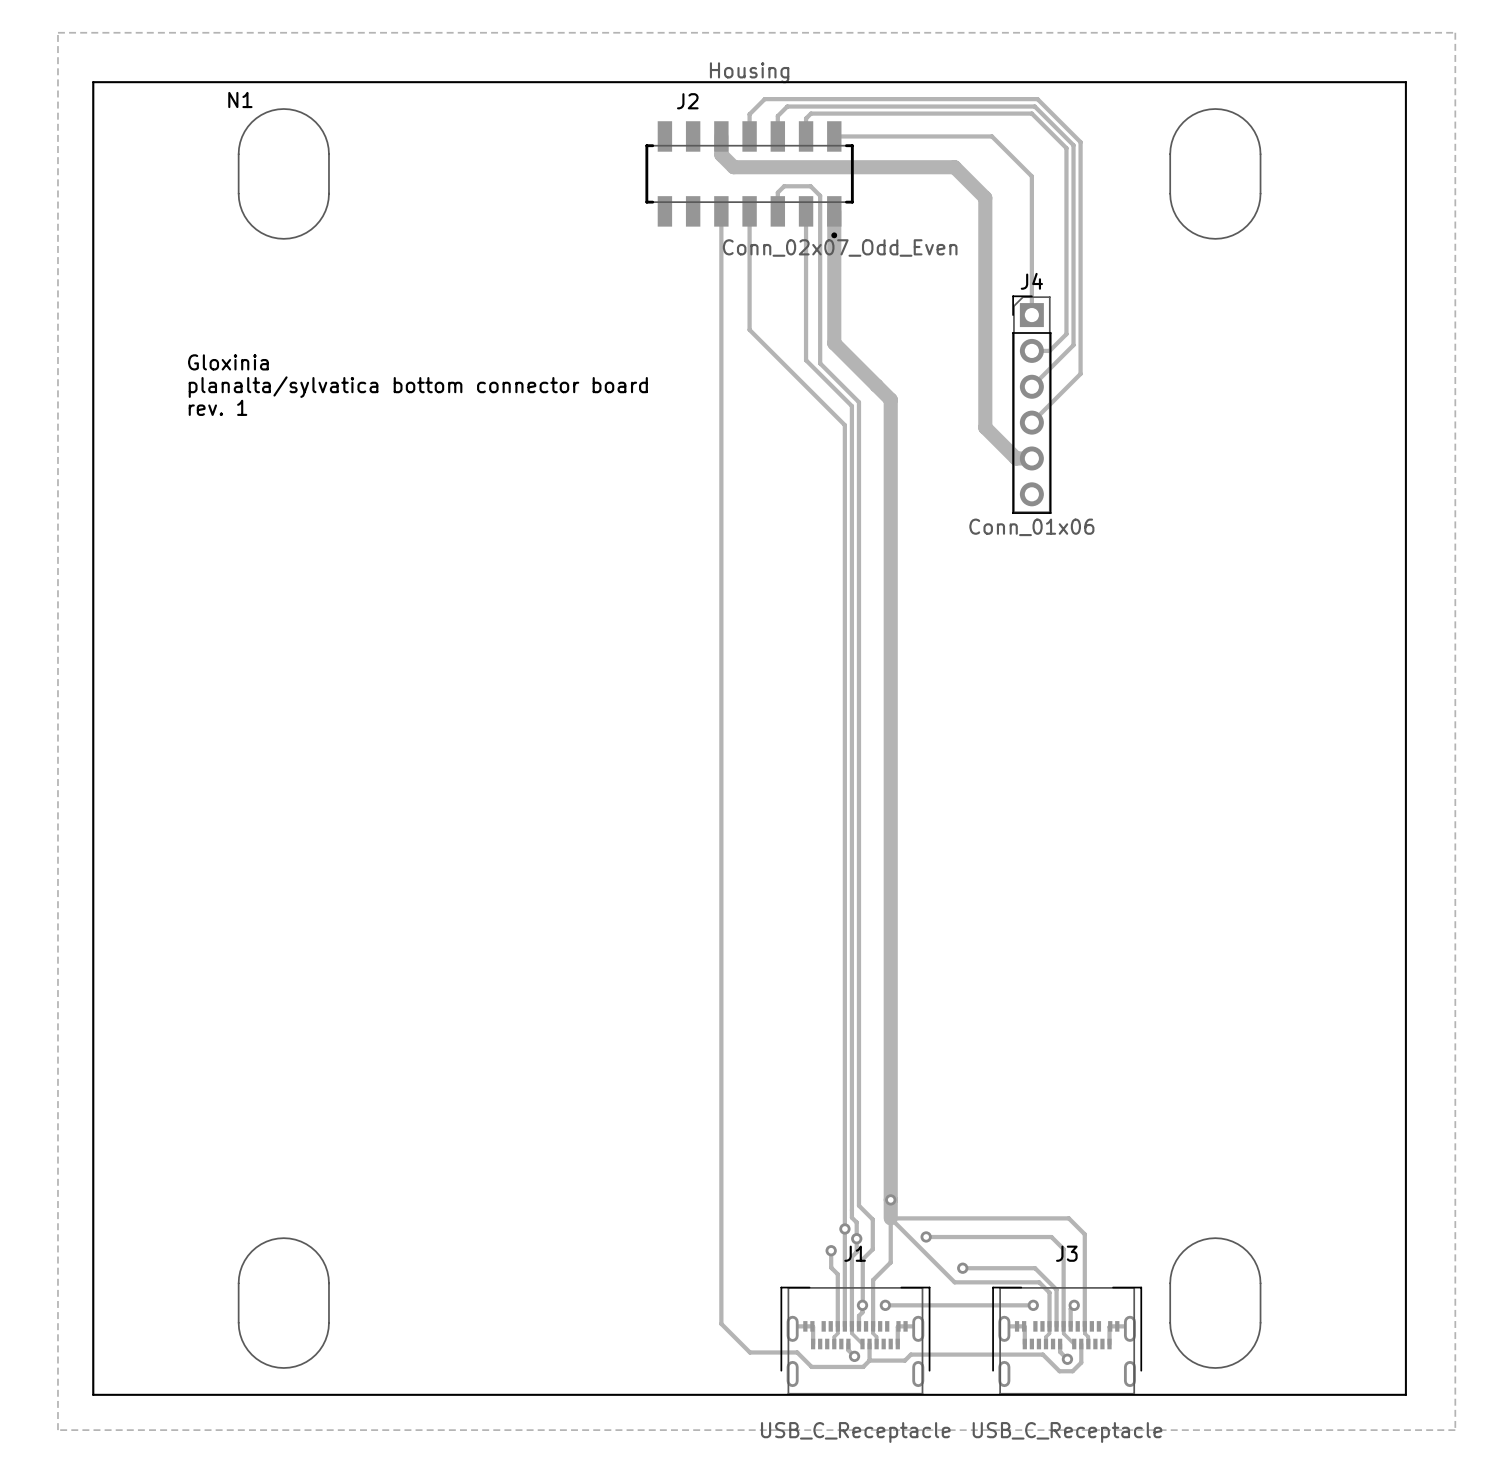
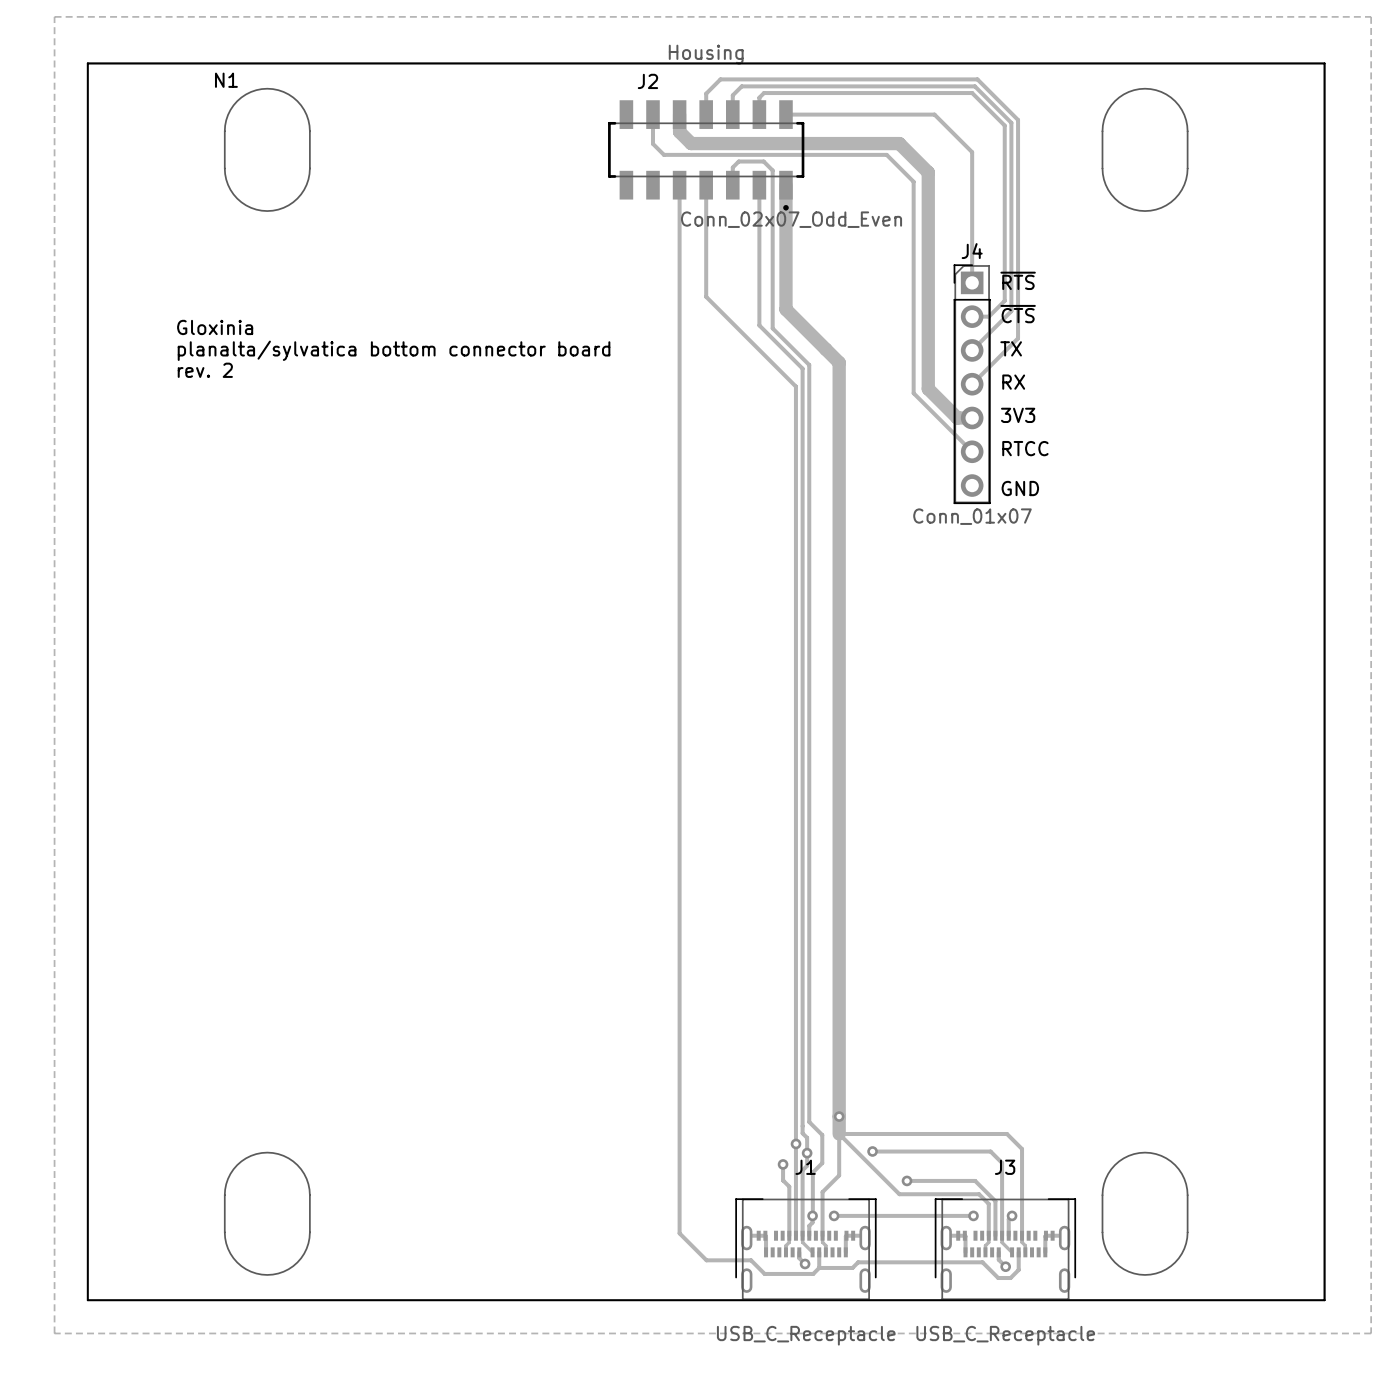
track: none -> (652, 114) (652, 143) (663, 154) (886, 154) (913, 181) (913, 393) (972, 451)
J4 footprint: [1012, 295, 1052, 514] -> [953, 264, 991, 505]
text: none -> ~{RTS} (1018, 280)
text: none -> ~{CTS} (1018, 314)
text: none -> TX (1011, 348)
text: rev. 1 (217, 407) -> rev. 2 (205, 370)
text: none -> RX (1013, 382)
text: none -> 3V3 (1018, 415)
text: none -> RTCC (1025, 448)
J4 value: Conn_01x06 (1031, 527) -> Conn_01x07 (972, 516)
text: none -> GND (1020, 488)

